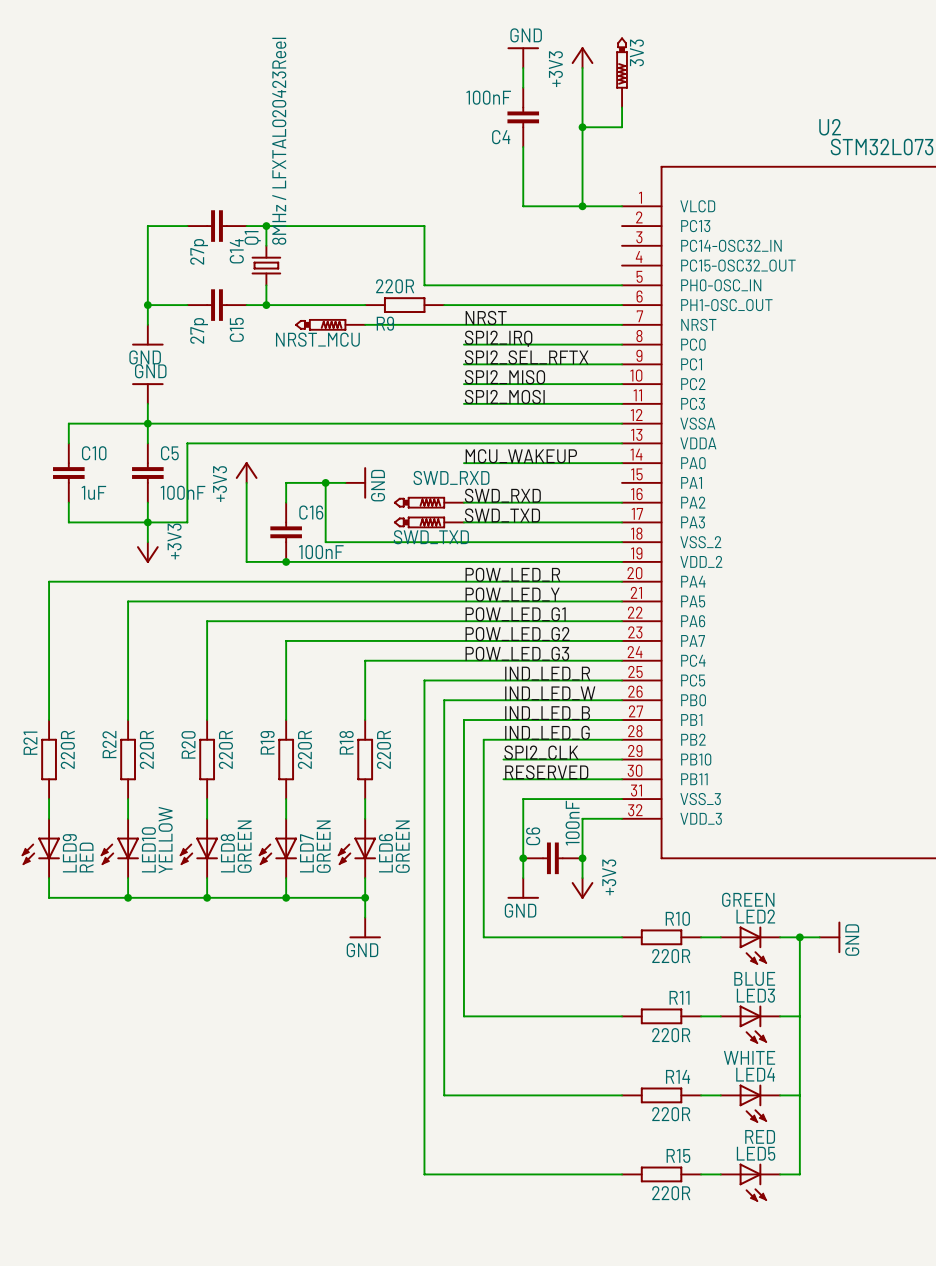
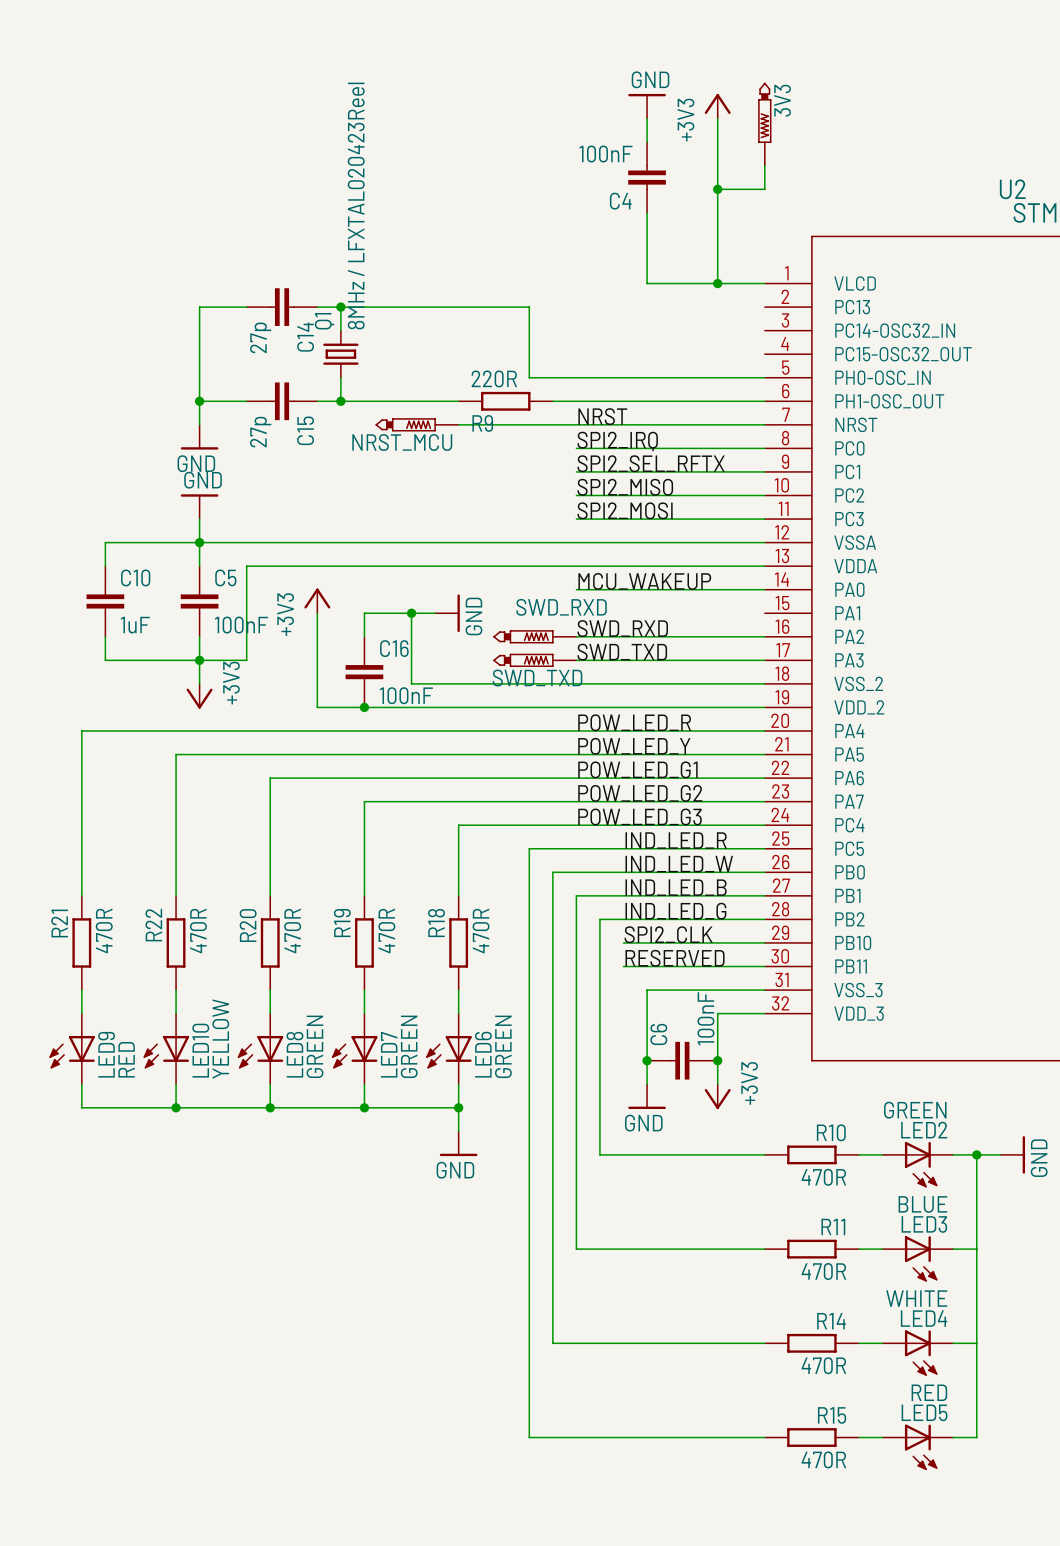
R21 value: 220R (67, 749) -> 470R (104, 930)
R22 value: 220R (146, 749) -> 470R (198, 930)
R20 value: 220R (225, 749) -> 470R (292, 930)
R19 value: 220R (304, 749) -> 470R (386, 930)
R18 value: 220R (383, 749) -> 470R (481, 930)
R10 value: 220R (671, 956) -> 470R (823, 1177)
R11 value: 220R (671, 1035) -> 470R (823, 1271)
R14 value: 220R (671, 1114) -> 470R (823, 1365)
R15 value: 220R (671, 1193) -> 470R (823, 1459)

